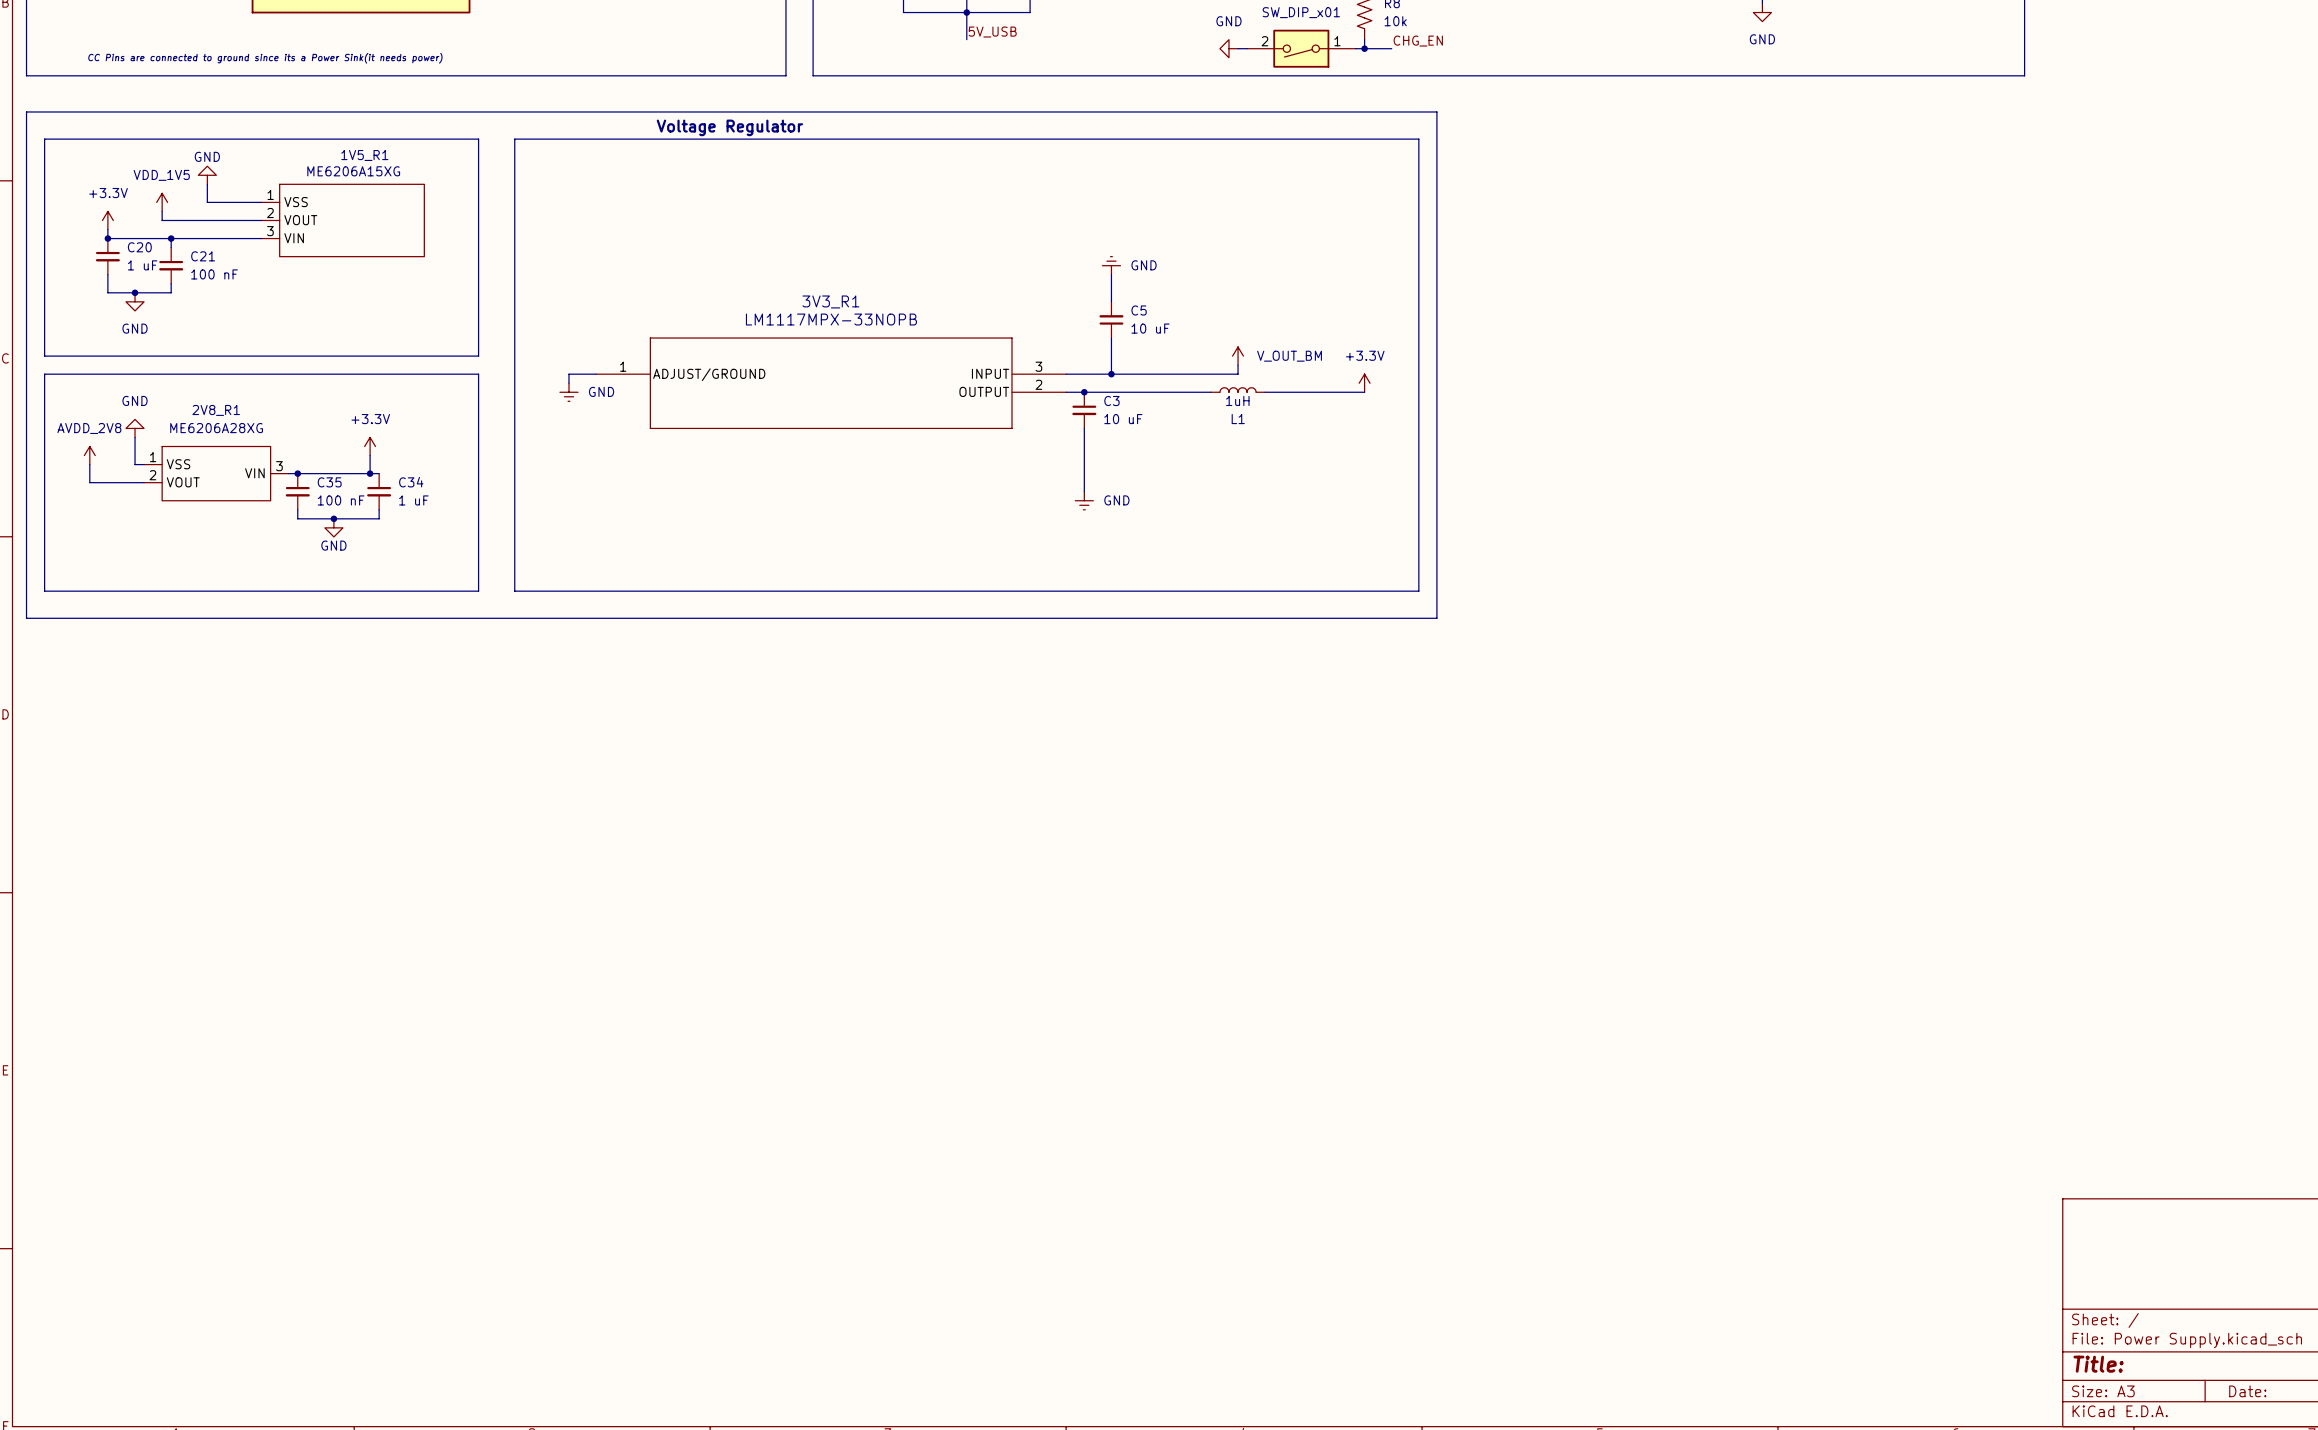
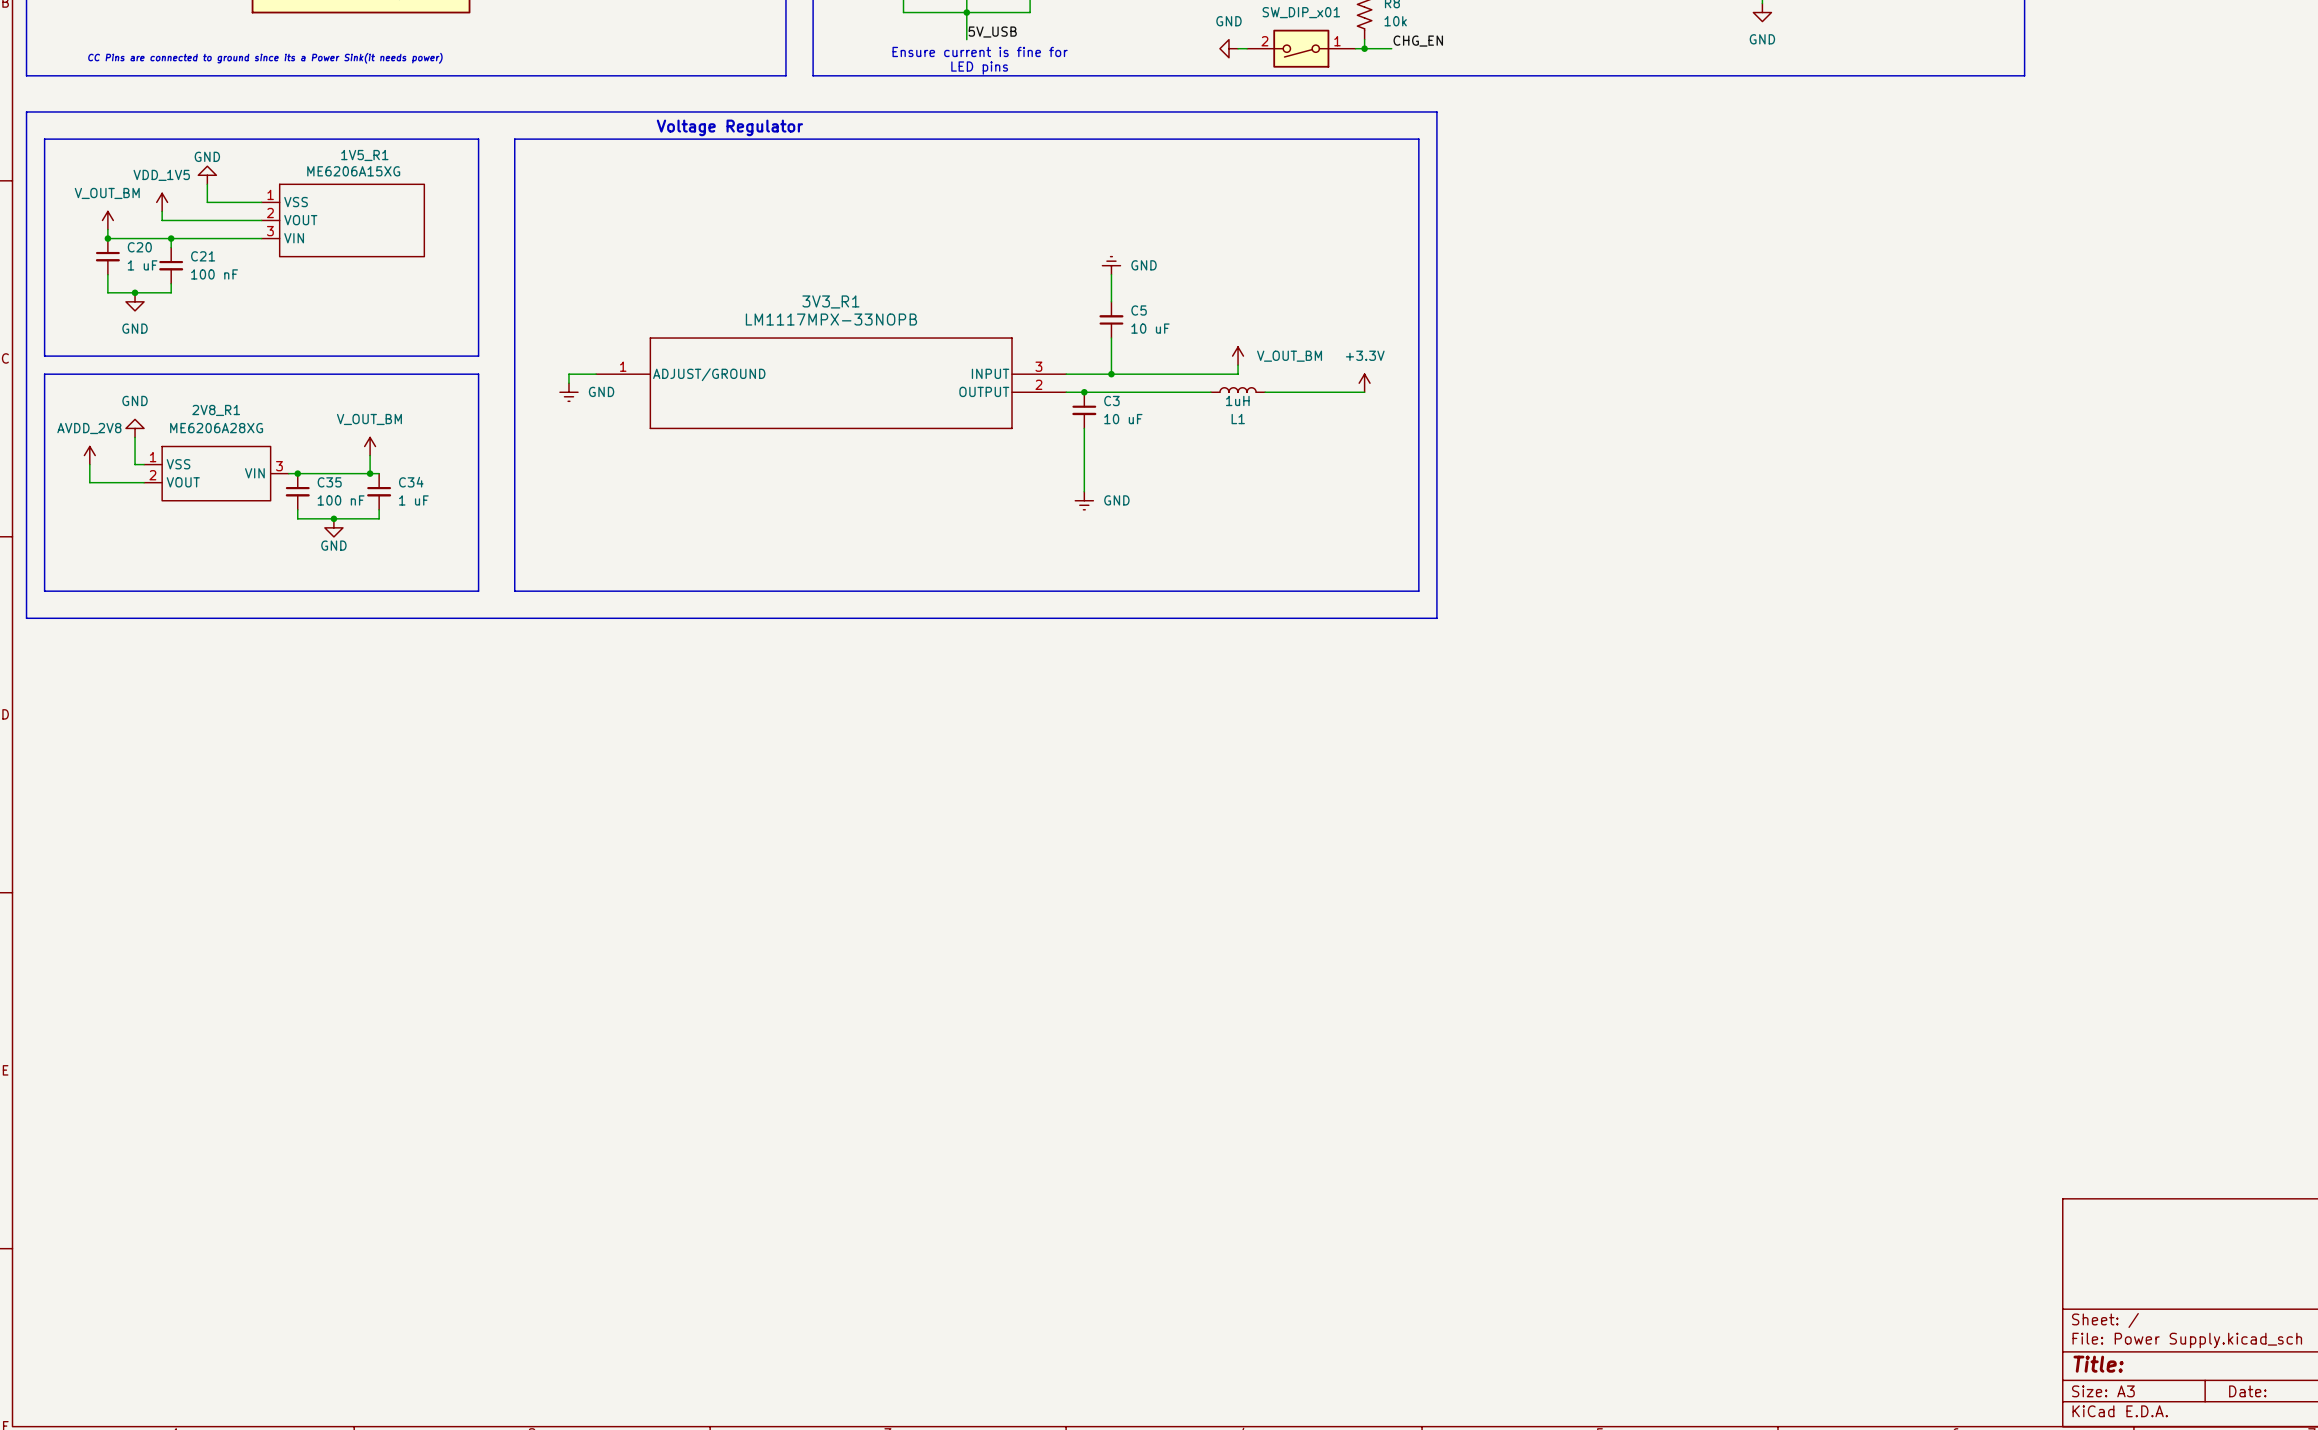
text: none -> Ensure current is fine for (980, 51)
text: none -> LED pins (979, 68)
power symbol: +3.3V (107, 220) -> V_OUT_BM (107, 220)
power symbol: +3.3V (370, 446) -> V_OUT_BM (370, 446)

